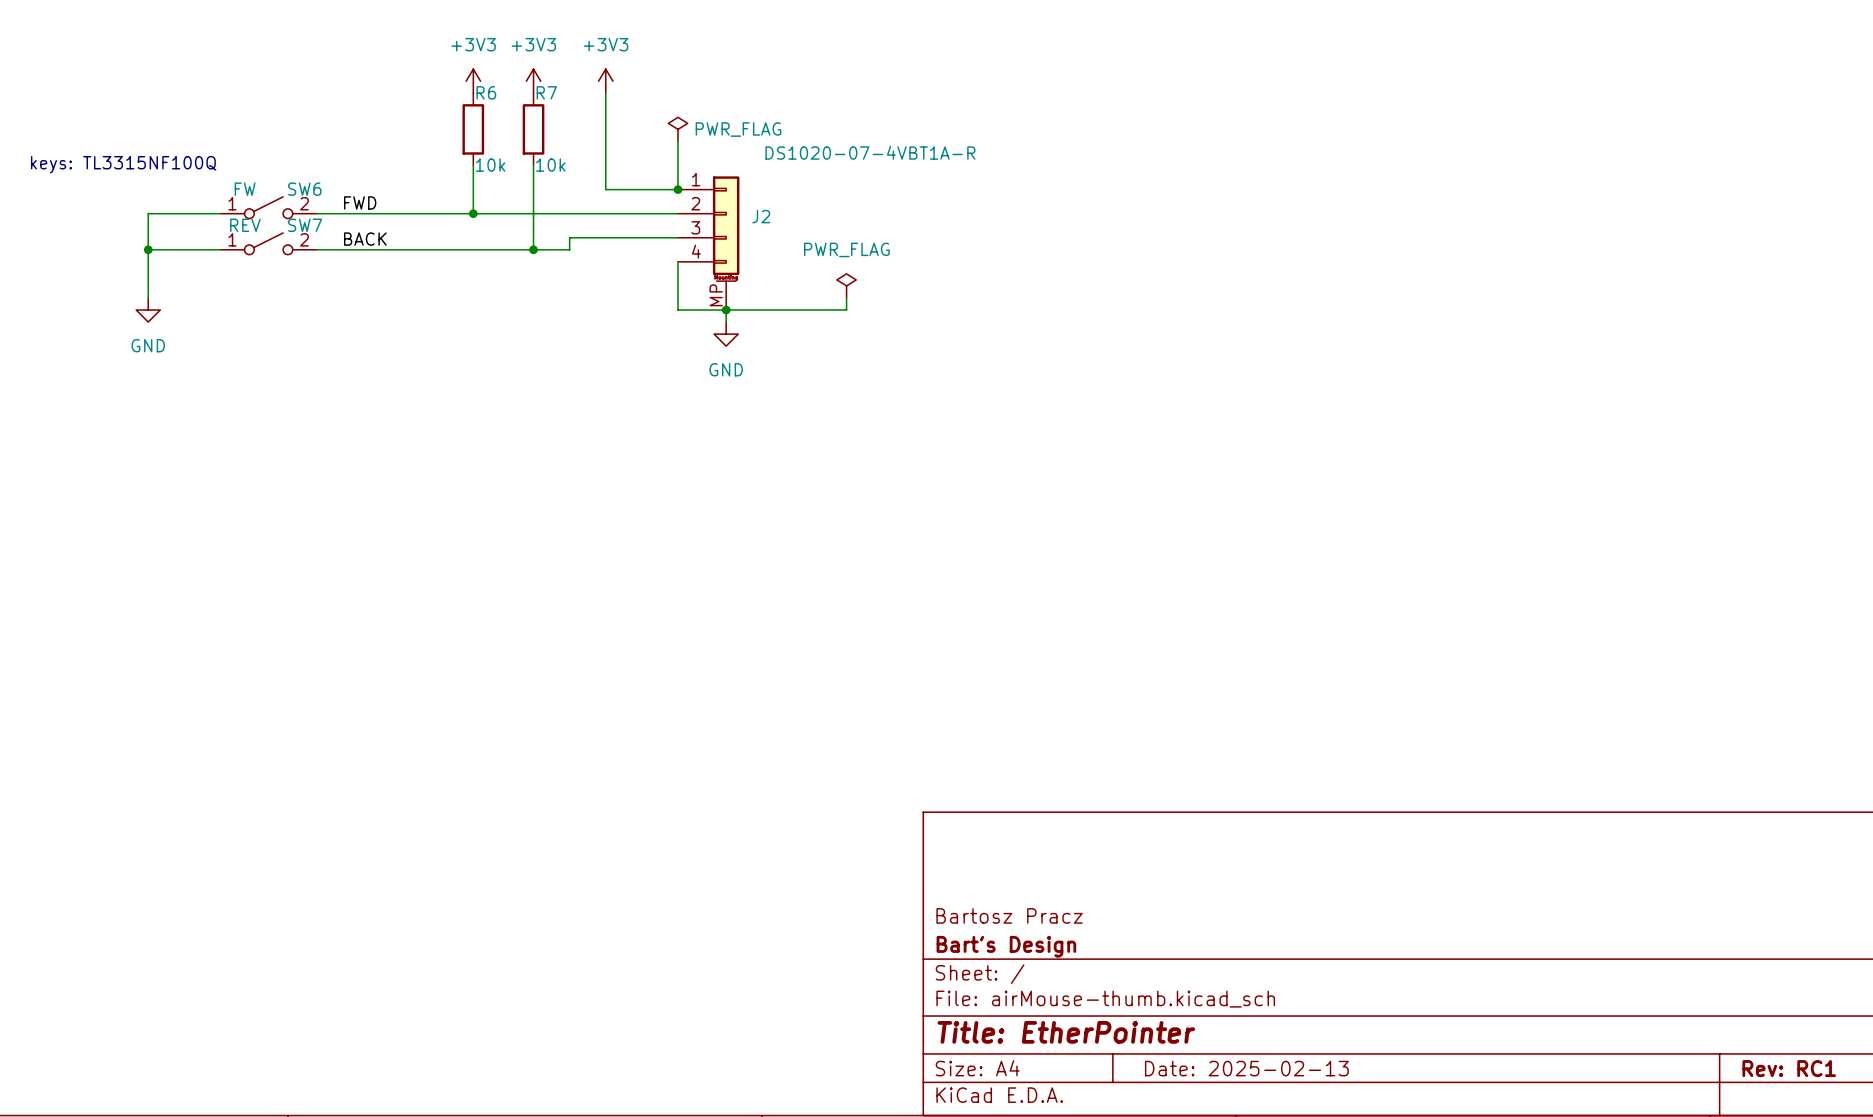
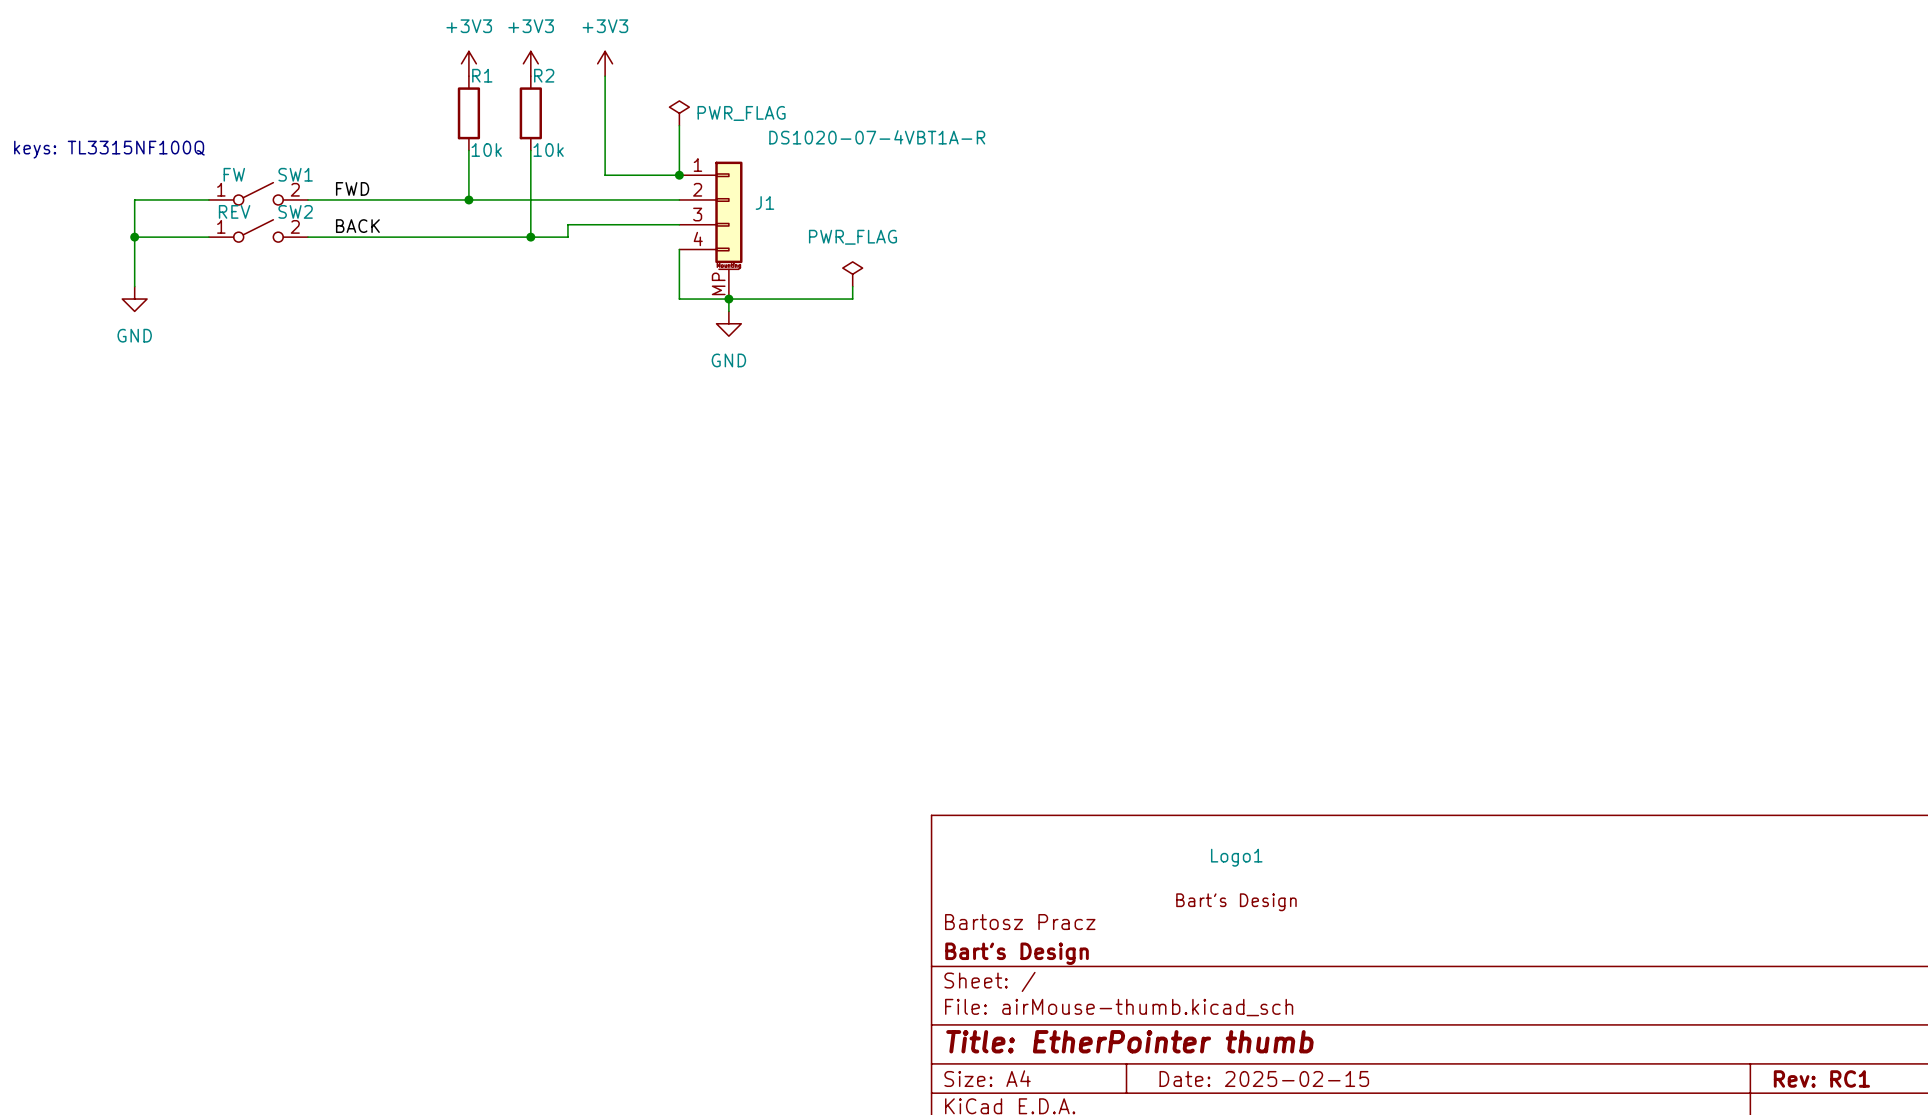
R6 name: R6 (486, 92) -> R1 (482, 75)
R7 name: R7 (546, 92) -> R2 (544, 75)
SW6 name: SW6 (304, 189) -> SW1 (295, 174)
J2 name: J2 (761, 216) -> J1 (764, 202)
SW7 name: SW7 (305, 225) -> SW2 (295, 211)
Logo1: none -> (1236, 879)
title block: Title: EtherPointer (1066, 1032) -> Title: EtherPointer thumb (1129, 1041)
title block: Date: 2025-02-13 (1246, 1068) -> Date: 2025-02-15 (1264, 1078)

